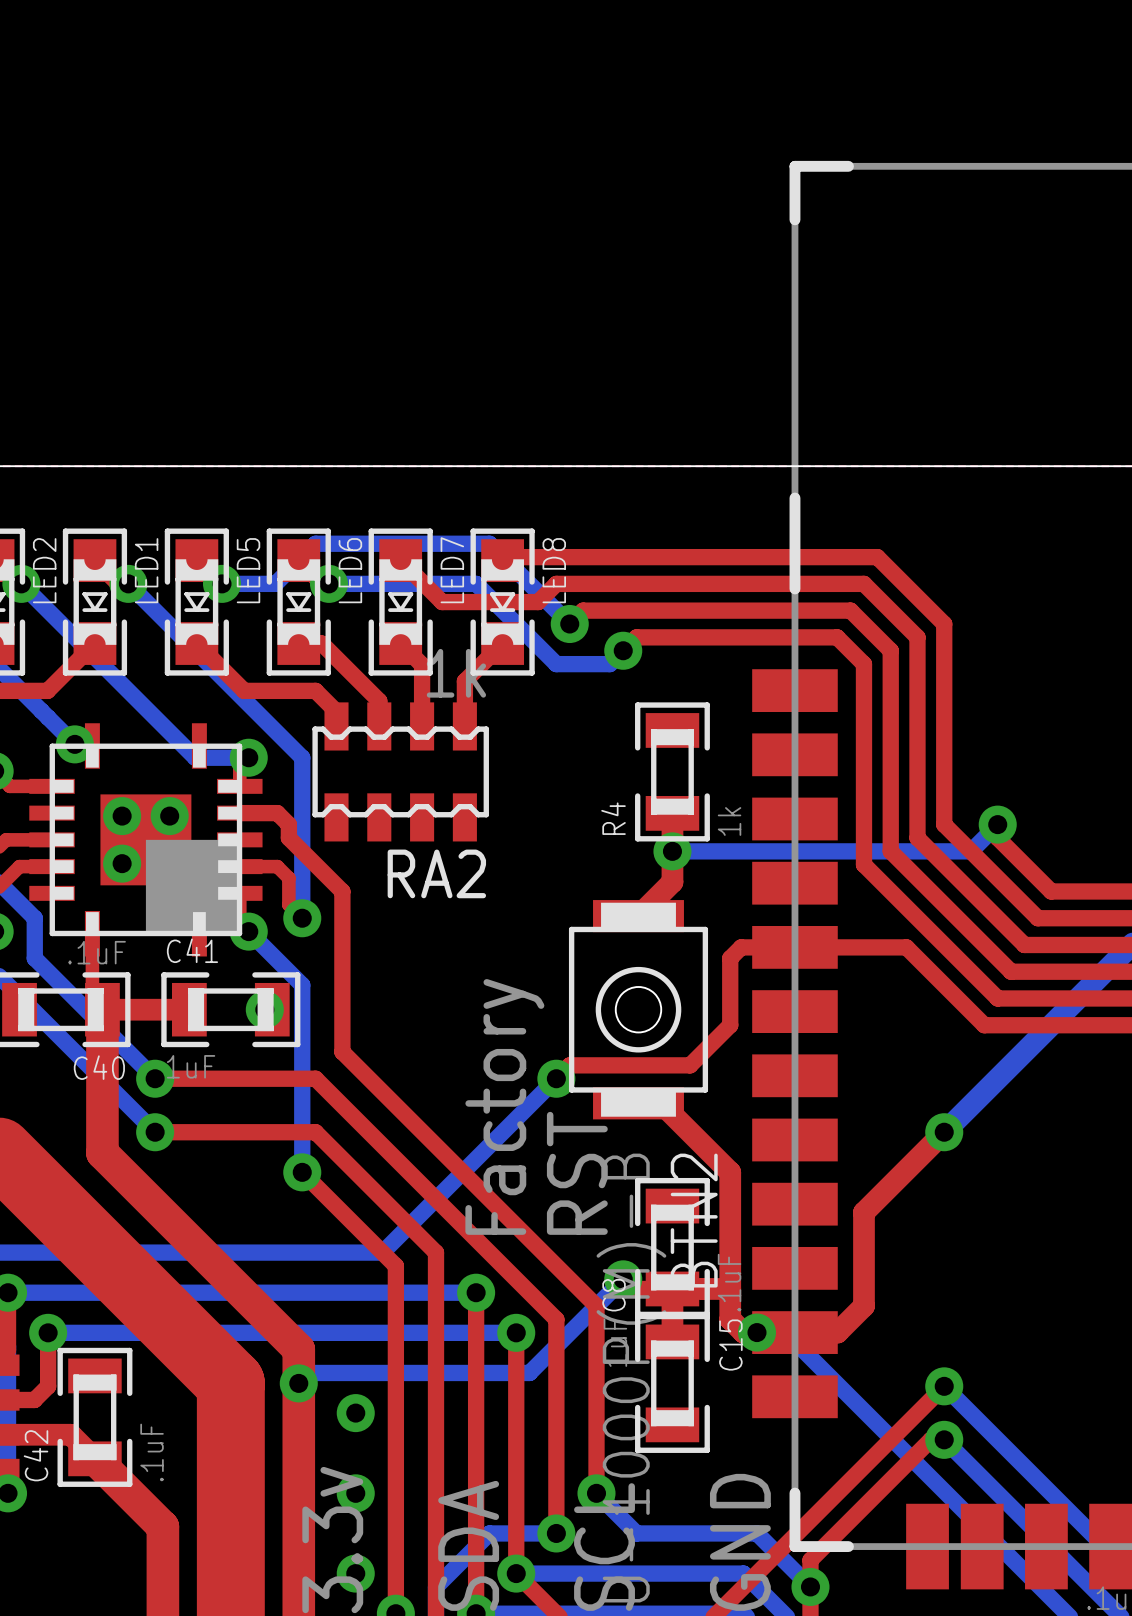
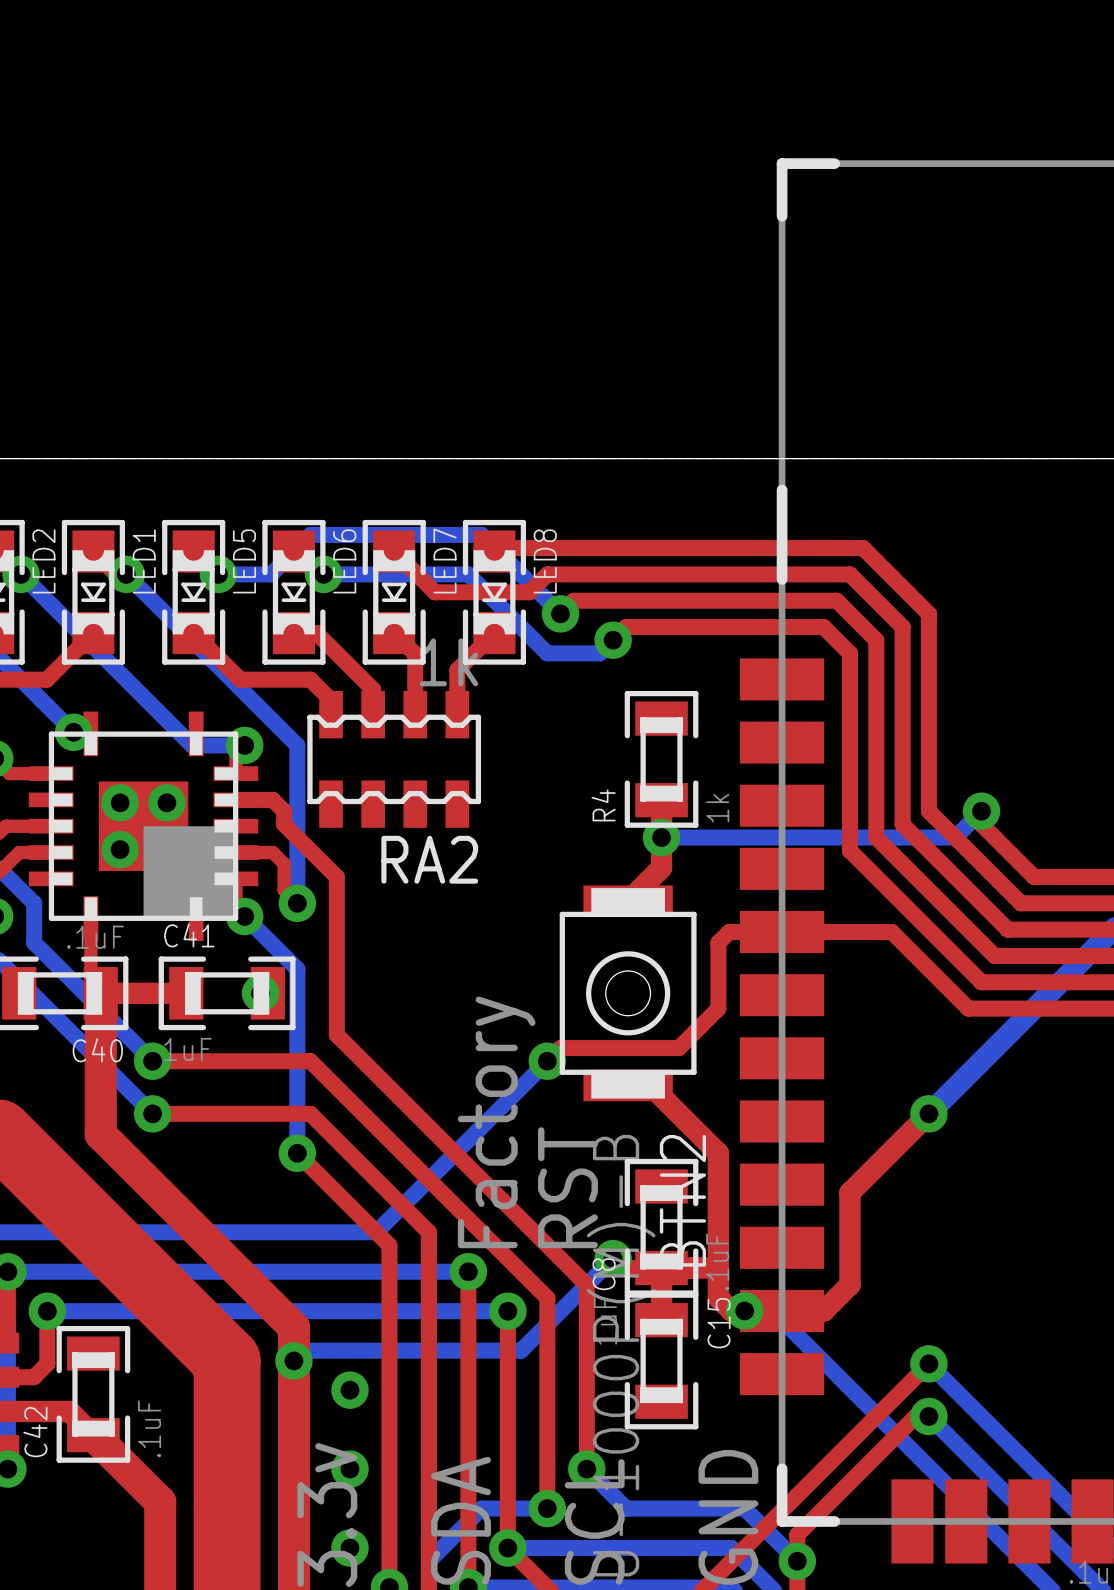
text position: Factory (504, 1106) -> Factory (496, 1122)
text position: RST (577, 1173) -> RST (567, 1187)

